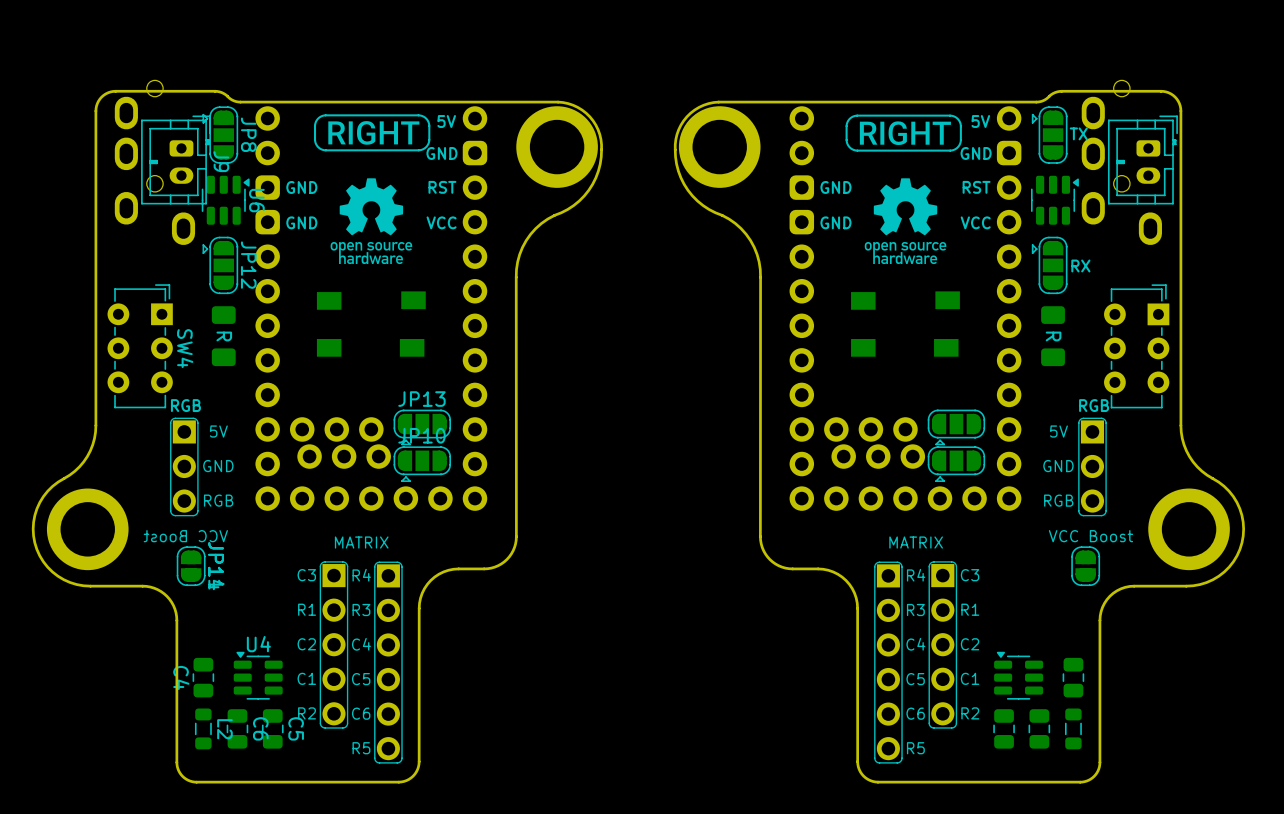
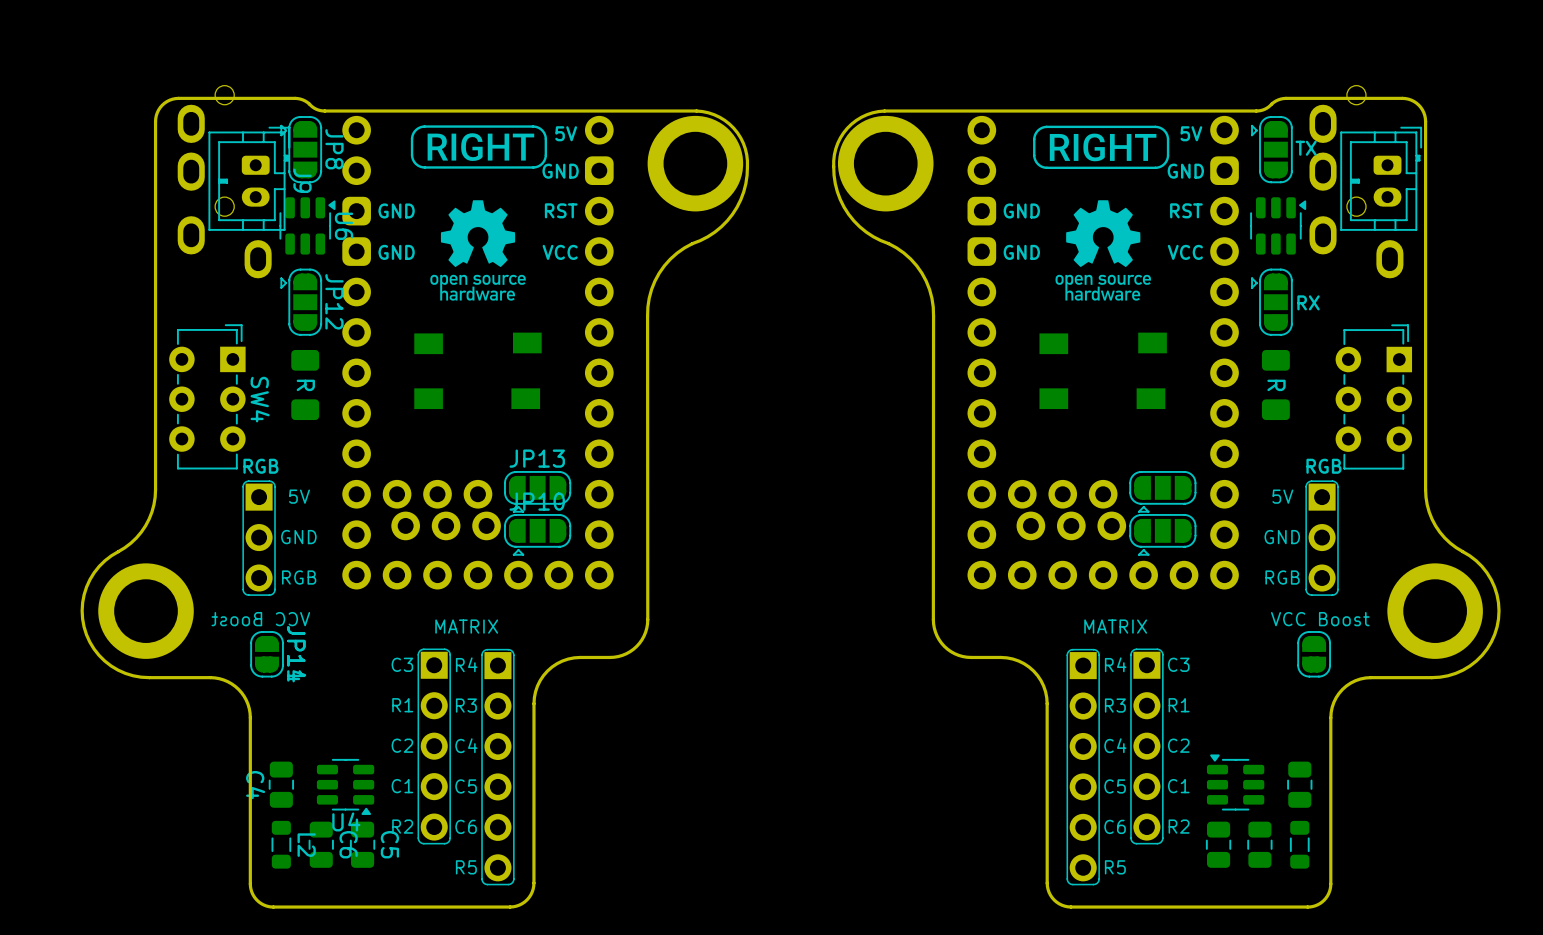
U4 rotation: 0° (258, 675) -> 180° (345, 786)

